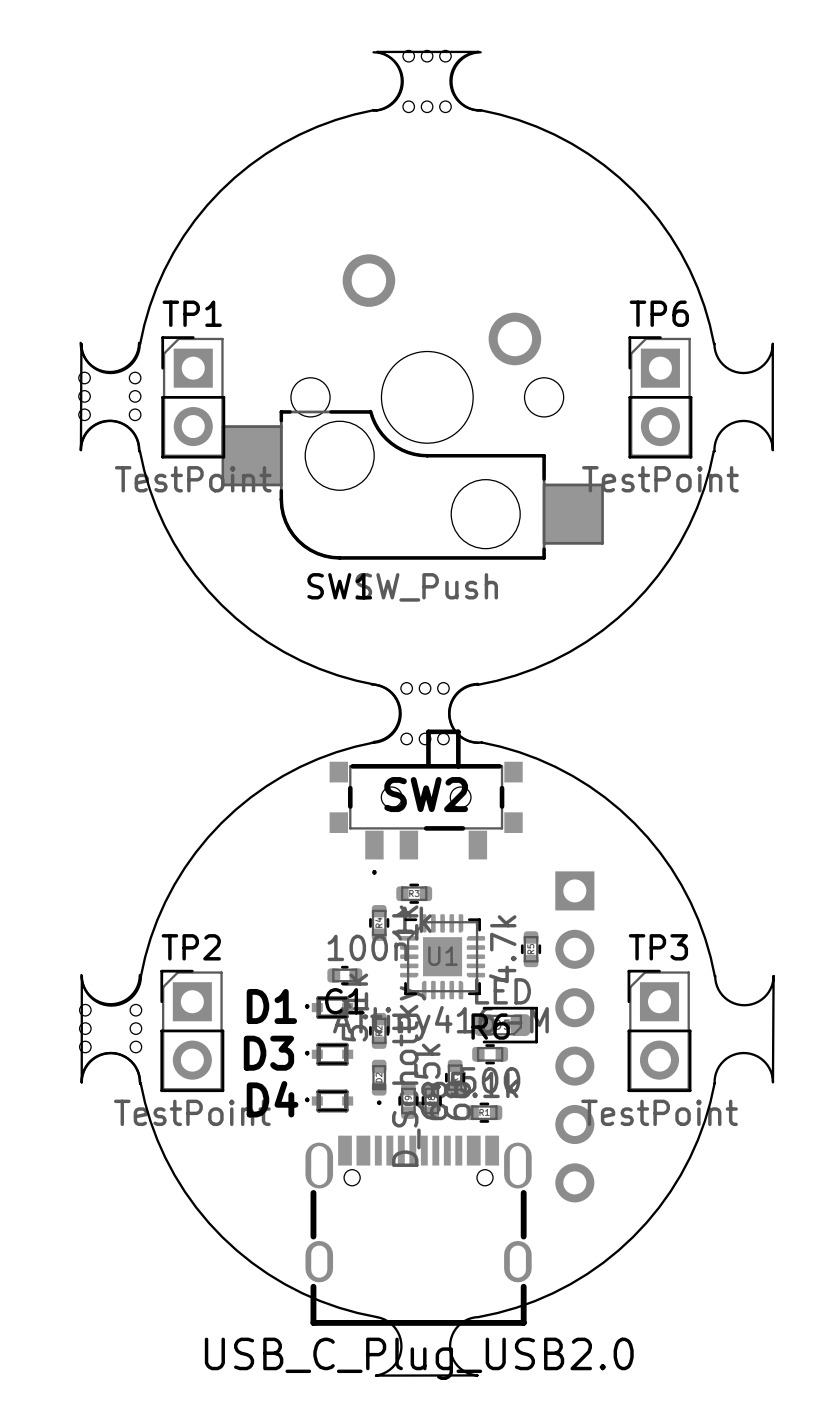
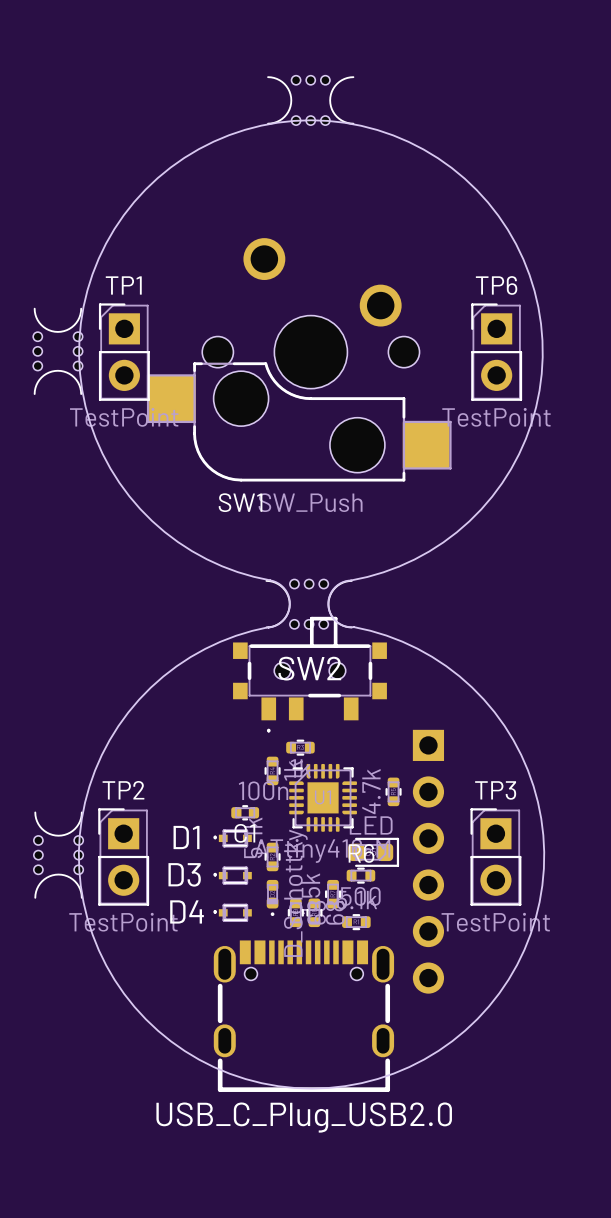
board edge: (139, 343) (137, 354) (132, 363) (124, 369) (110, 373) (100, 371) (91, 365) (84, 357) (81, 343) (80, 450) (84, 436) (96, 424) (114, 421) (127, 426) (137, 440) (149, 489) (164, 525) (195, 575) (221, 604) (267, 641) (301, 661) (337, 675) (386, 688) (396, 699) (399, 710) (397, 725) (387, 736) (374, 742) (336, 752) (300, 766) (250, 797) (221, 823) (184, 868) (165, 902) (150, 938) (138, 987) (129, 999) (122, 1003) (111, 1005) (96, 1001) (85, 990) (81, 976) (81, 1082) (87, 1065) (101, 1054) (118, 1054) (133, 1063) (138, 1072) (150, 1121) (165, 1157) (184, 1191) (208, 1222) (251, 1262) (284, 1284) (320, 1301) (380, 1317) (390, 1323) (399, 1335) (400, 1354) (392, 1367) (376, 1375) (477, 1375) (463, 1370) (453, 1360) (450, 1342) (456, 1328) (467, 1319) (516, 1307) (553, 1293) (603, 1262) (633, 1237) (670, 1191) (689, 1157) (704, 1121) (716, 1072) (723, 1060) (739, 1053) (753, 1054) (767, 1065) (772, 1082) (773, 976) (771, 986) (766, 995) (757, 1001) (744, 1005) (730, 1001) (722, 995) (717, 986) (715, 976) -> none
board edge: (140, 343) (149, 306) (173, 252) (194, 220) (220, 190) (265, 154) (299, 134) (335, 120) (383, 108) (395, 99) (401, 85) (399, 70) (390, 58) (377, 51) (478, 51) (464, 56) (454, 66) (450, 80) (455, 98) (470, 108) (518, 120) (554, 134) (588, 154) (633, 190) (659, 220) (680, 252) (697, 287) (714, 343) -> none
board edge: (714, 343) (716, 355) (722, 364) (732, 370) (743, 373) (754, 370) (764, 364) (770, 355) (772, 343) (772, 450) (767, 433) (756, 424) (742, 420) (726, 426) (715, 440) (703, 489) (689, 525) (669, 559) (632, 604) (602, 630) (552, 661) (515, 675) (477, 683) -> none
board edge: (481, 742) (519, 752) (555, 766) (589, 786) (634, 823) (660, 852) (681, 885) (698, 920) (714, 976) -> (354, 627) (386, 635) (432, 656) (472, 687) (504, 725) (527, 770) (541, 818) (544, 852) (539, 902) (524, 949) (508, 979) (477, 1019) (438, 1050) (409, 1067) (361, 1083) (311, 1088) (261, 1083) (214, 1067) (184, 1051) (158, 1030) (124, 993) (106, 965) (87, 918) (79, 869) (79, 835) (89, 786) (101, 755) (118, 726) (139, 699) (176, 666) (205, 648) (236, 635) (280, 623) (287, 613) (289, 598) (285, 590) (276, 582) (237, 572) (192, 551) (164, 531) (129, 496) (110, 468) (90, 422) (80, 373) (79, 339) (83, 306) (92, 274) (106, 243) (134, 202) (170, 167) (198, 149) (245, 129) (277, 122) (311, 120) (361, 125) (393, 135) (438, 158) (476, 190) (498, 215) (523, 259) (538, 307) (542, 357) (536, 407) (519, 454) (502, 483) (469, 521) (429, 551) (383, 572) (351, 580)

